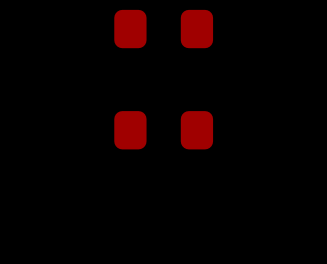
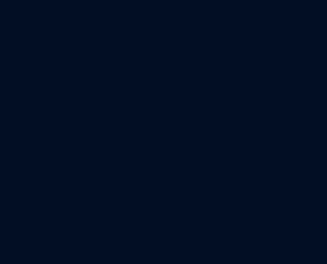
part: (163, 29) -> none
part: (163, 130) -> none

